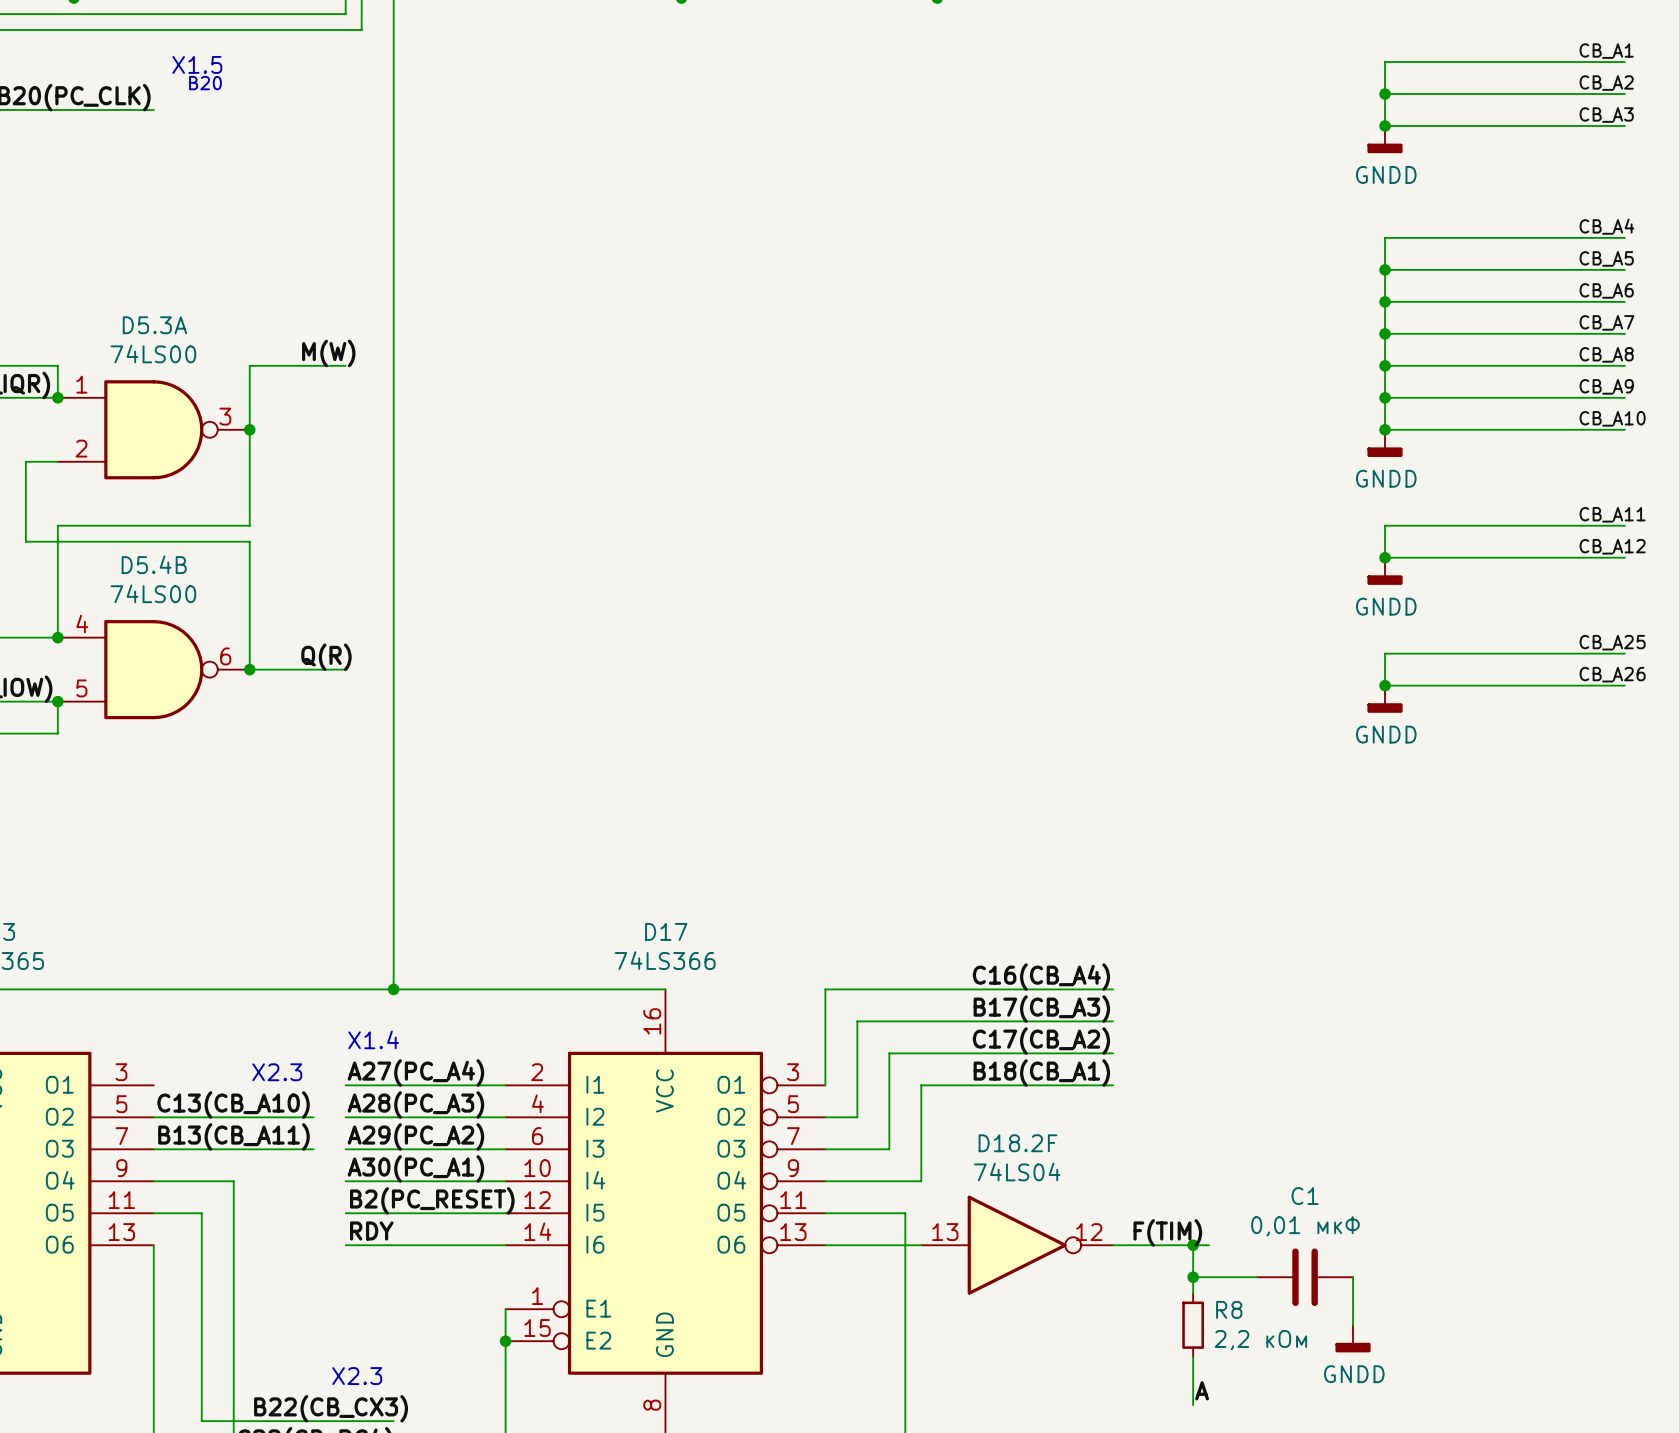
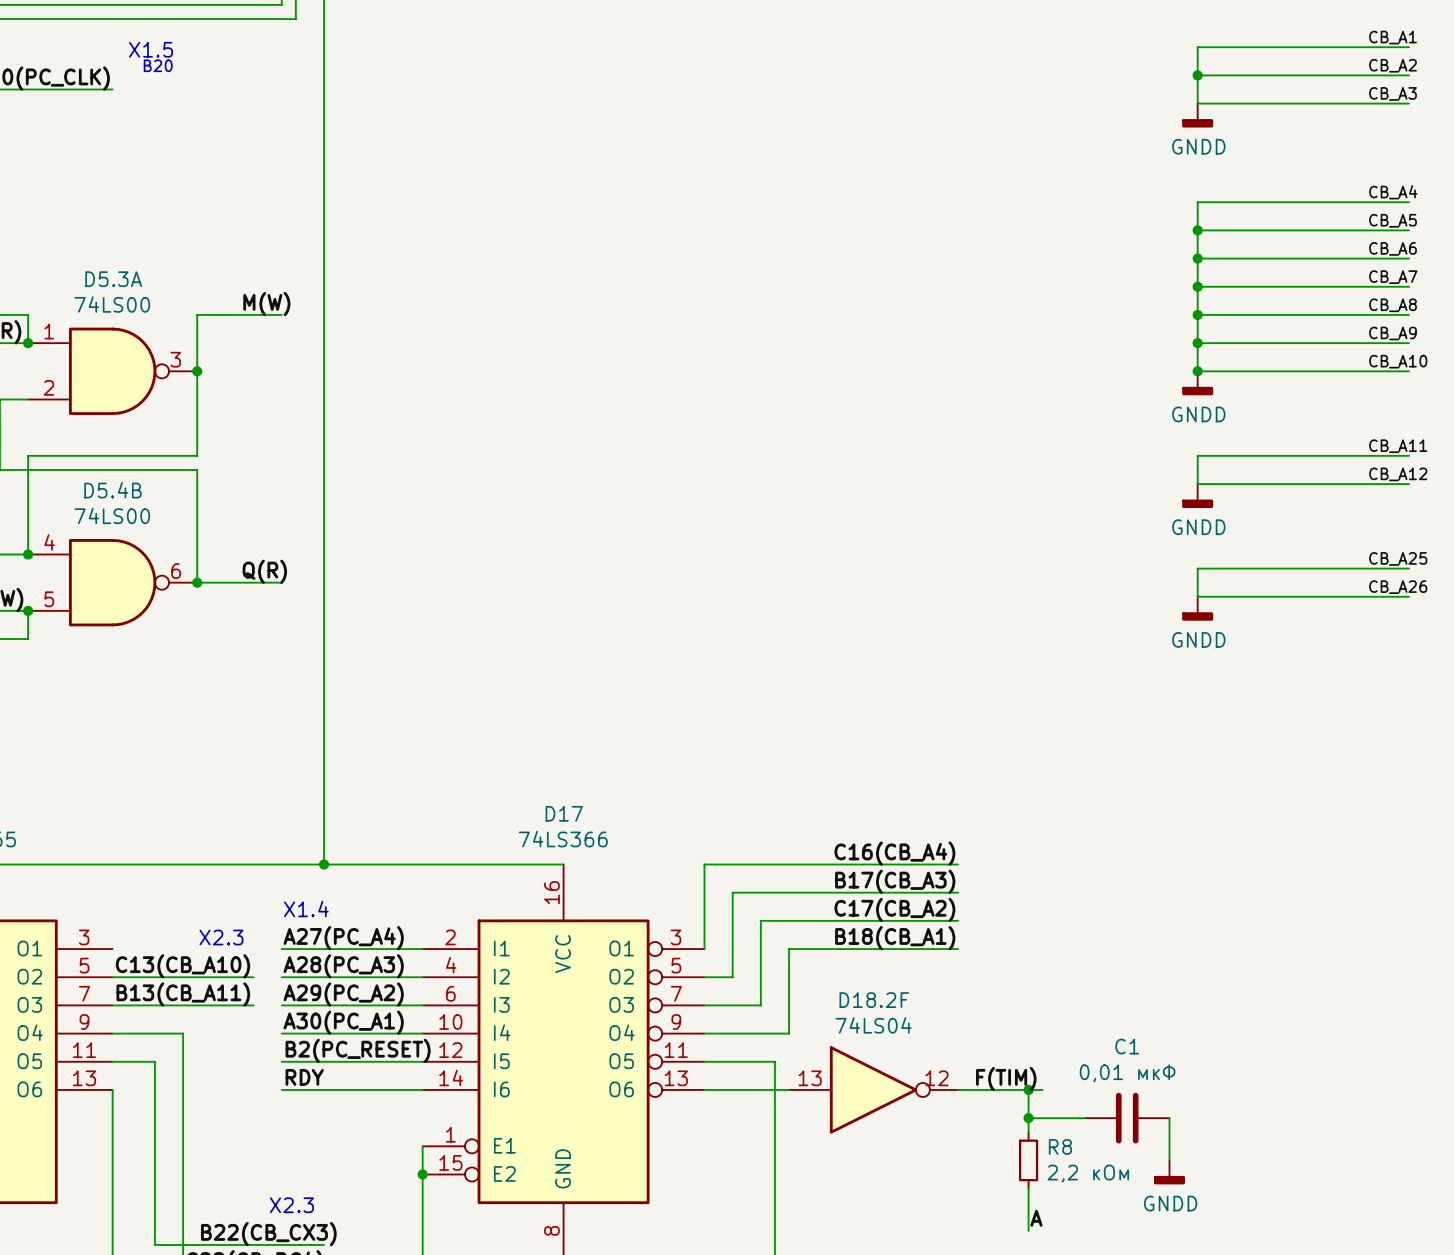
junction: (1385, 125) -> none
junction: (1385, 557) -> none
junction: (1385, 685) -> none

